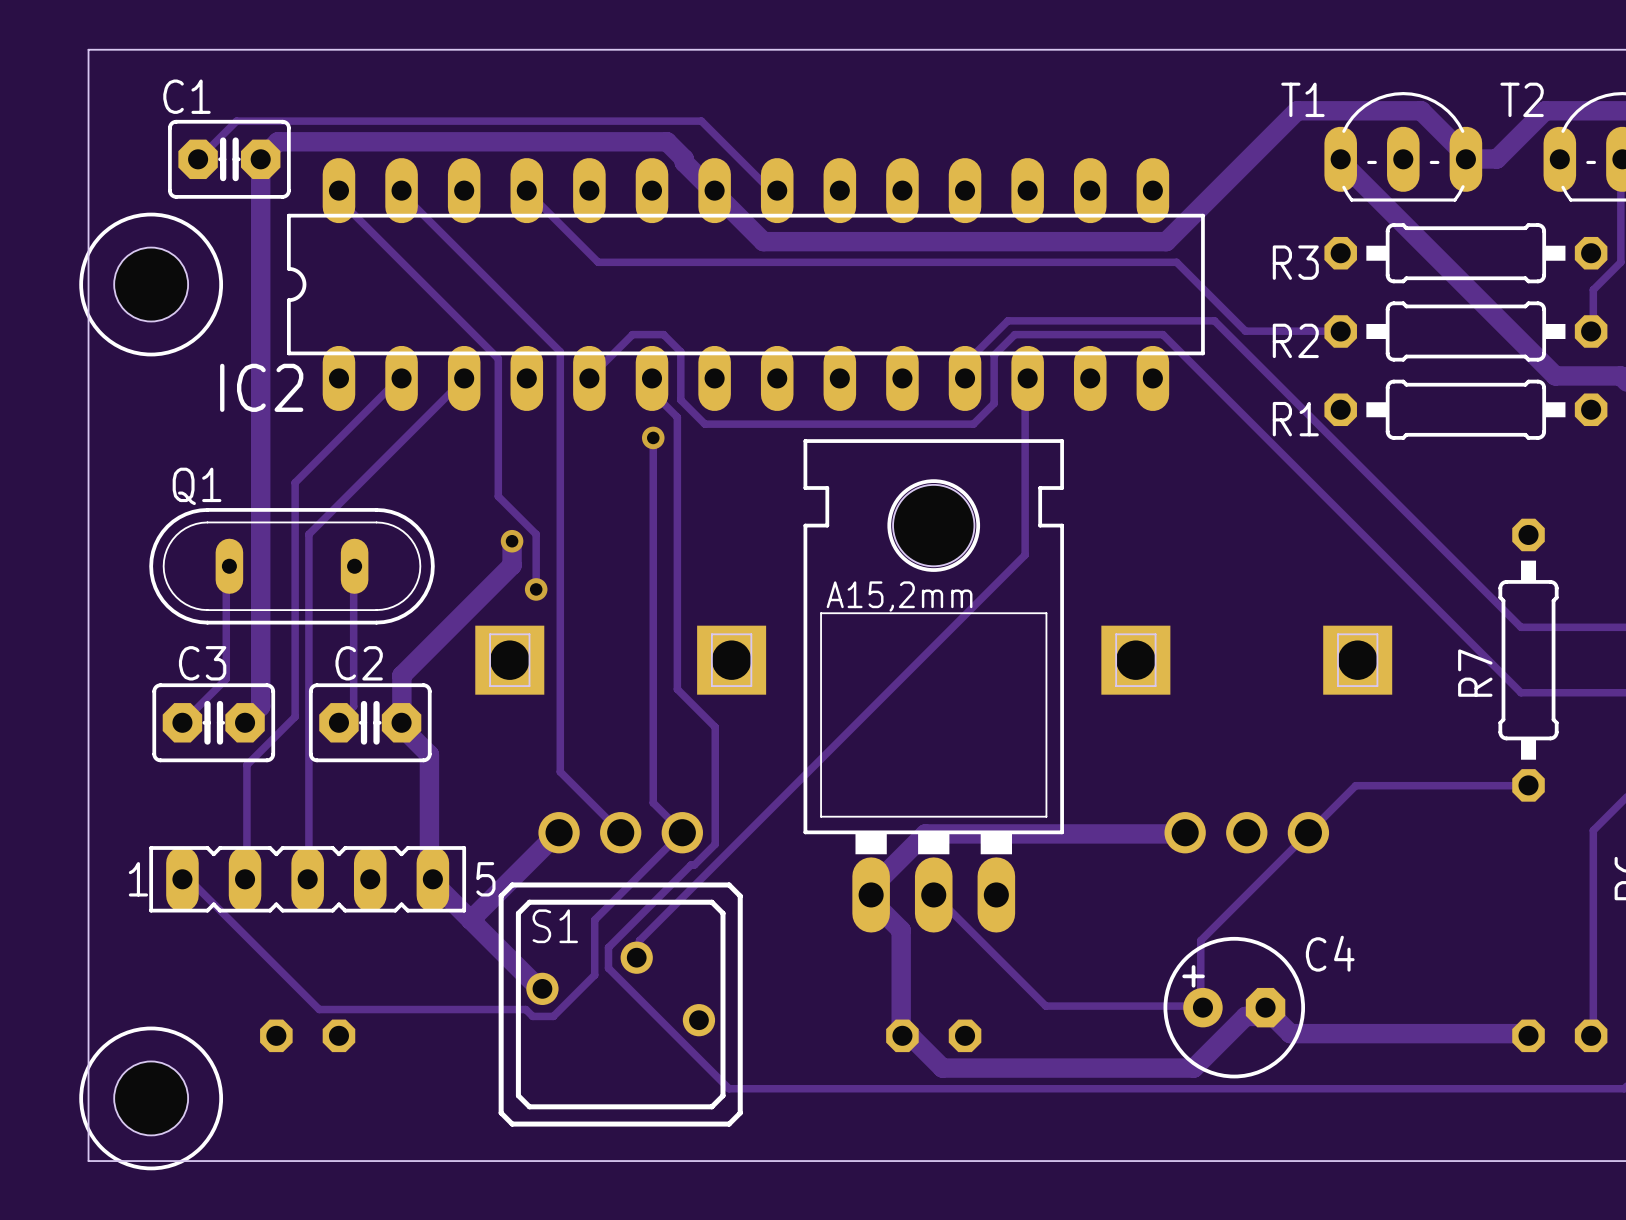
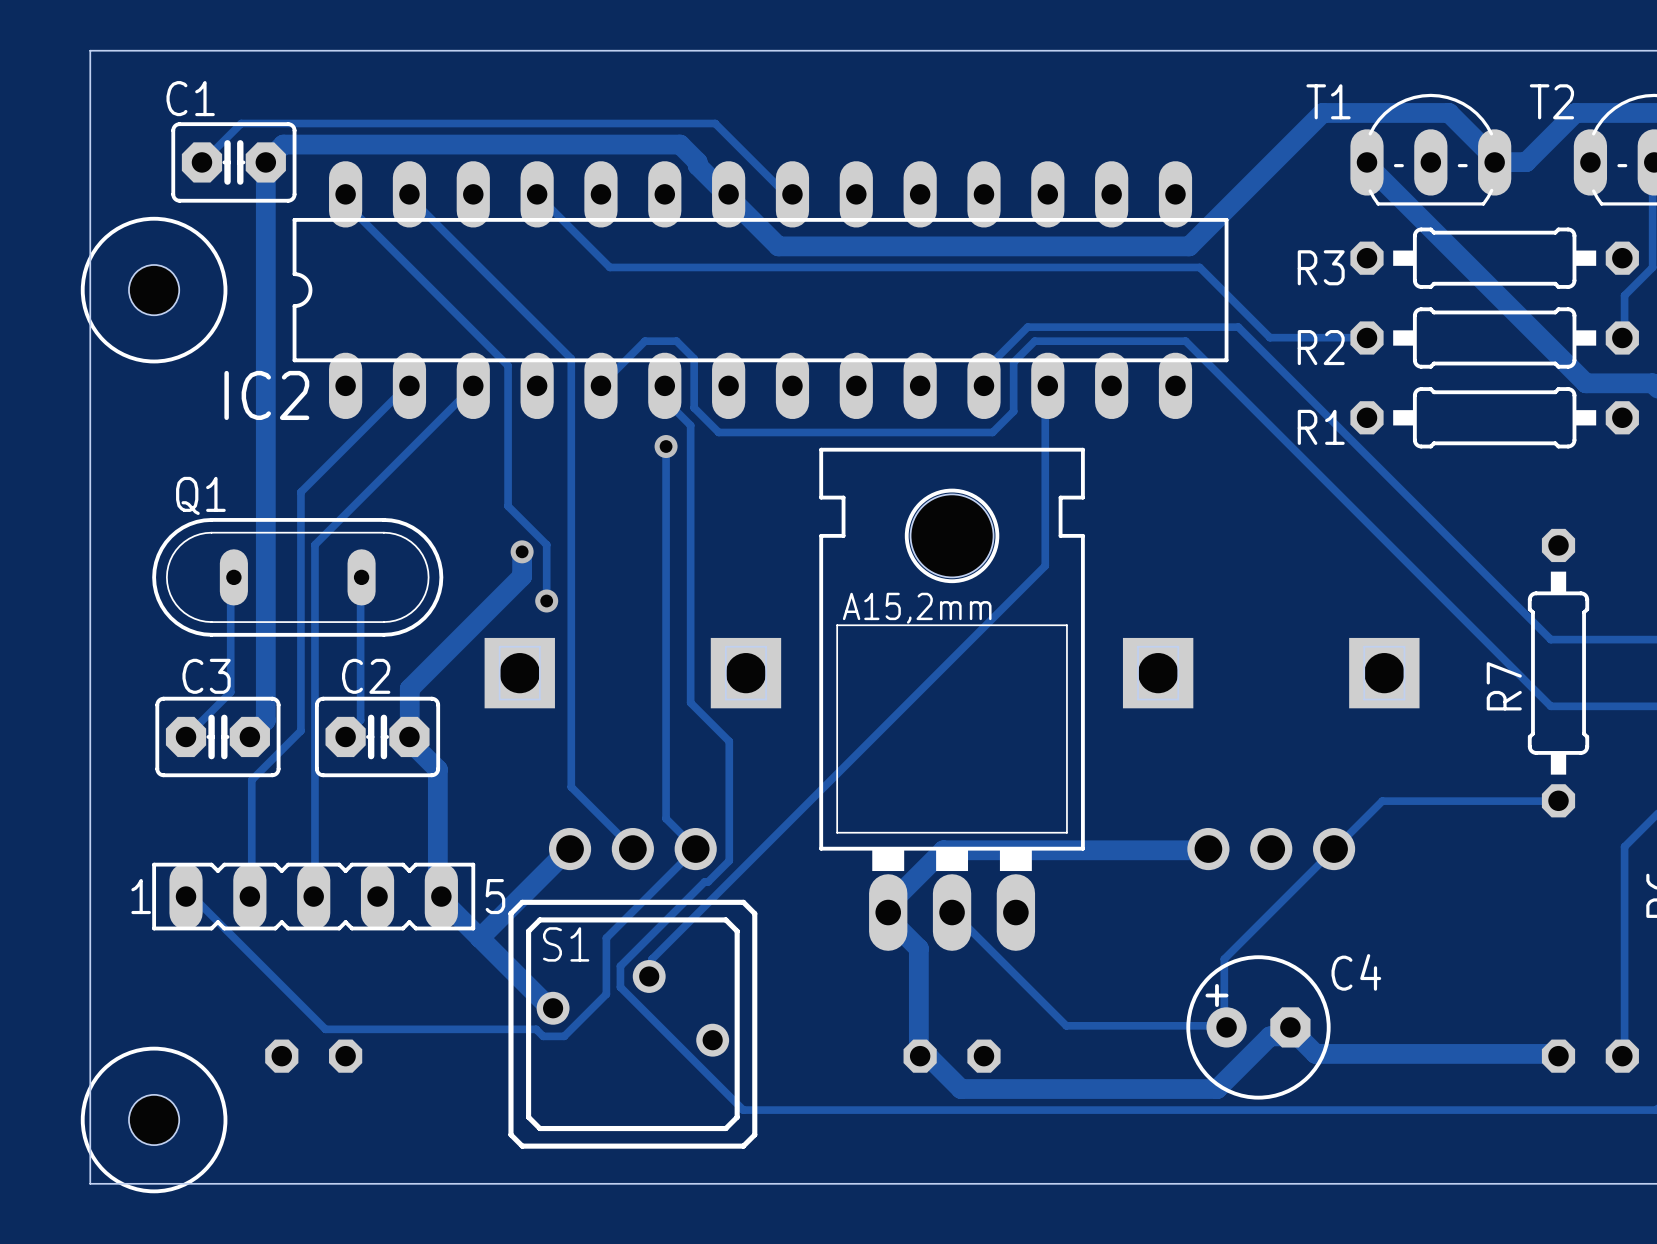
hole size: [114, 247, 189, 322] -> [128, 264, 180, 316]
hole size: [114, 1061, 189, 1136] -> [128, 1094, 180, 1146]

